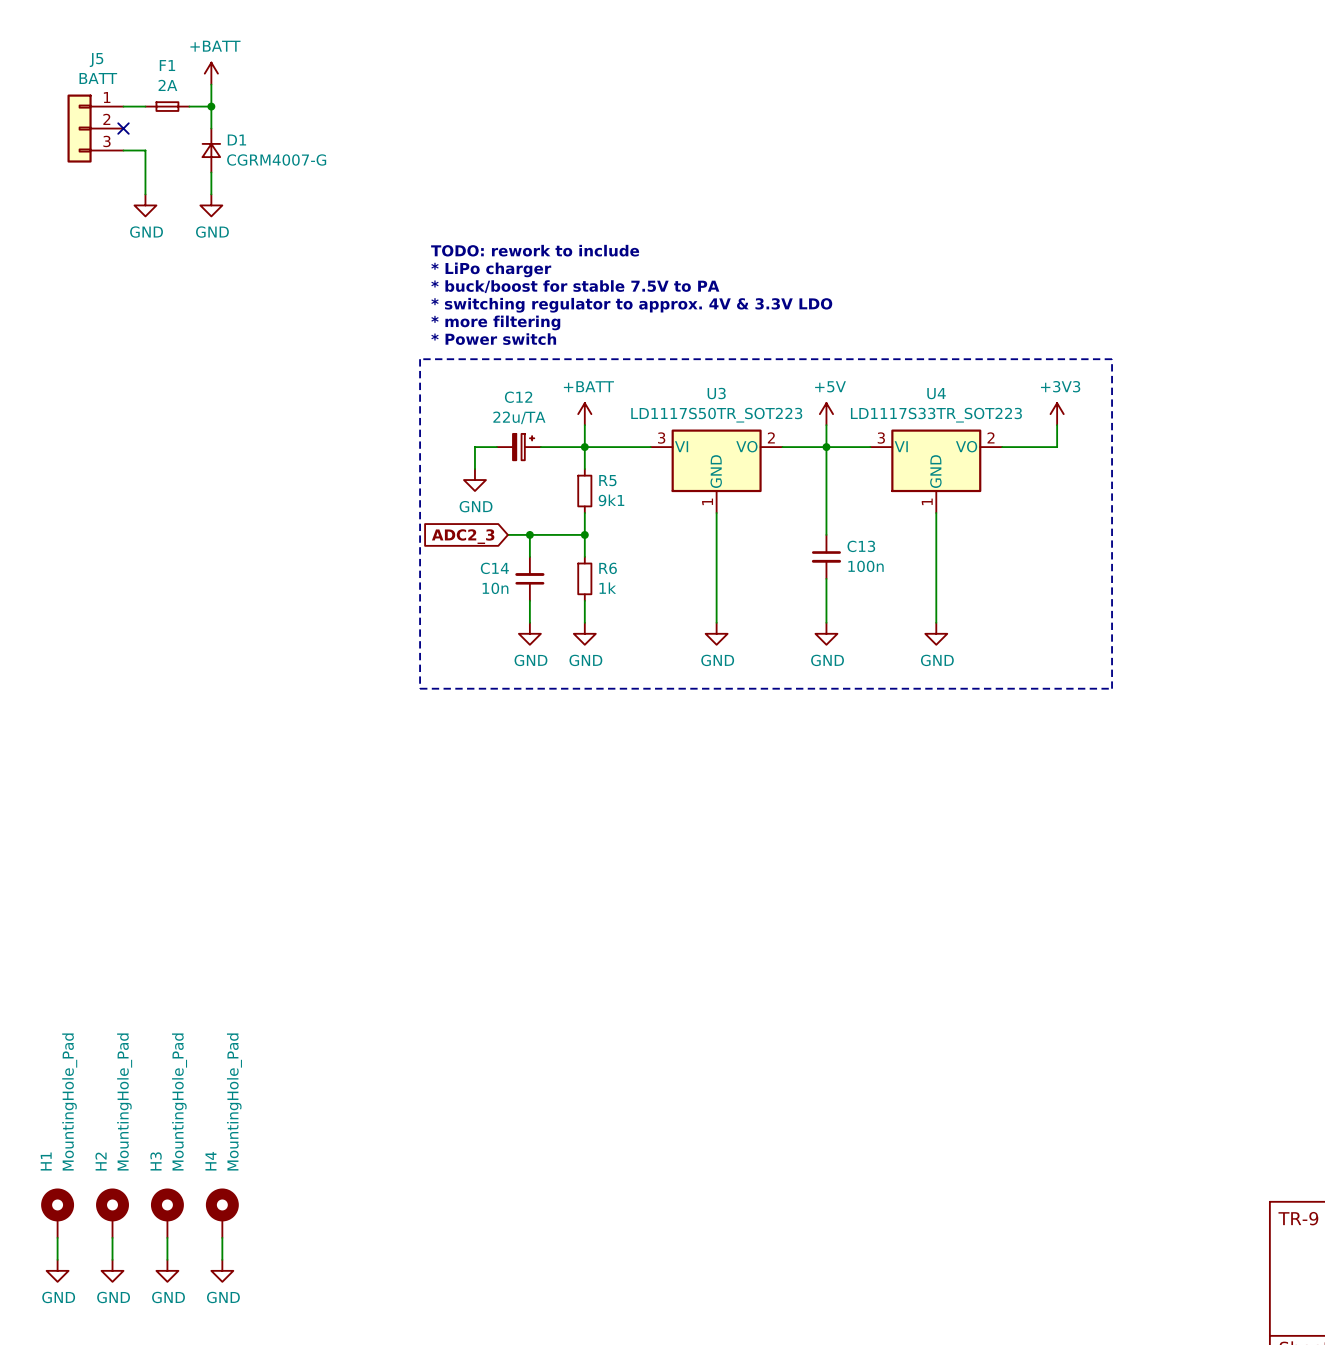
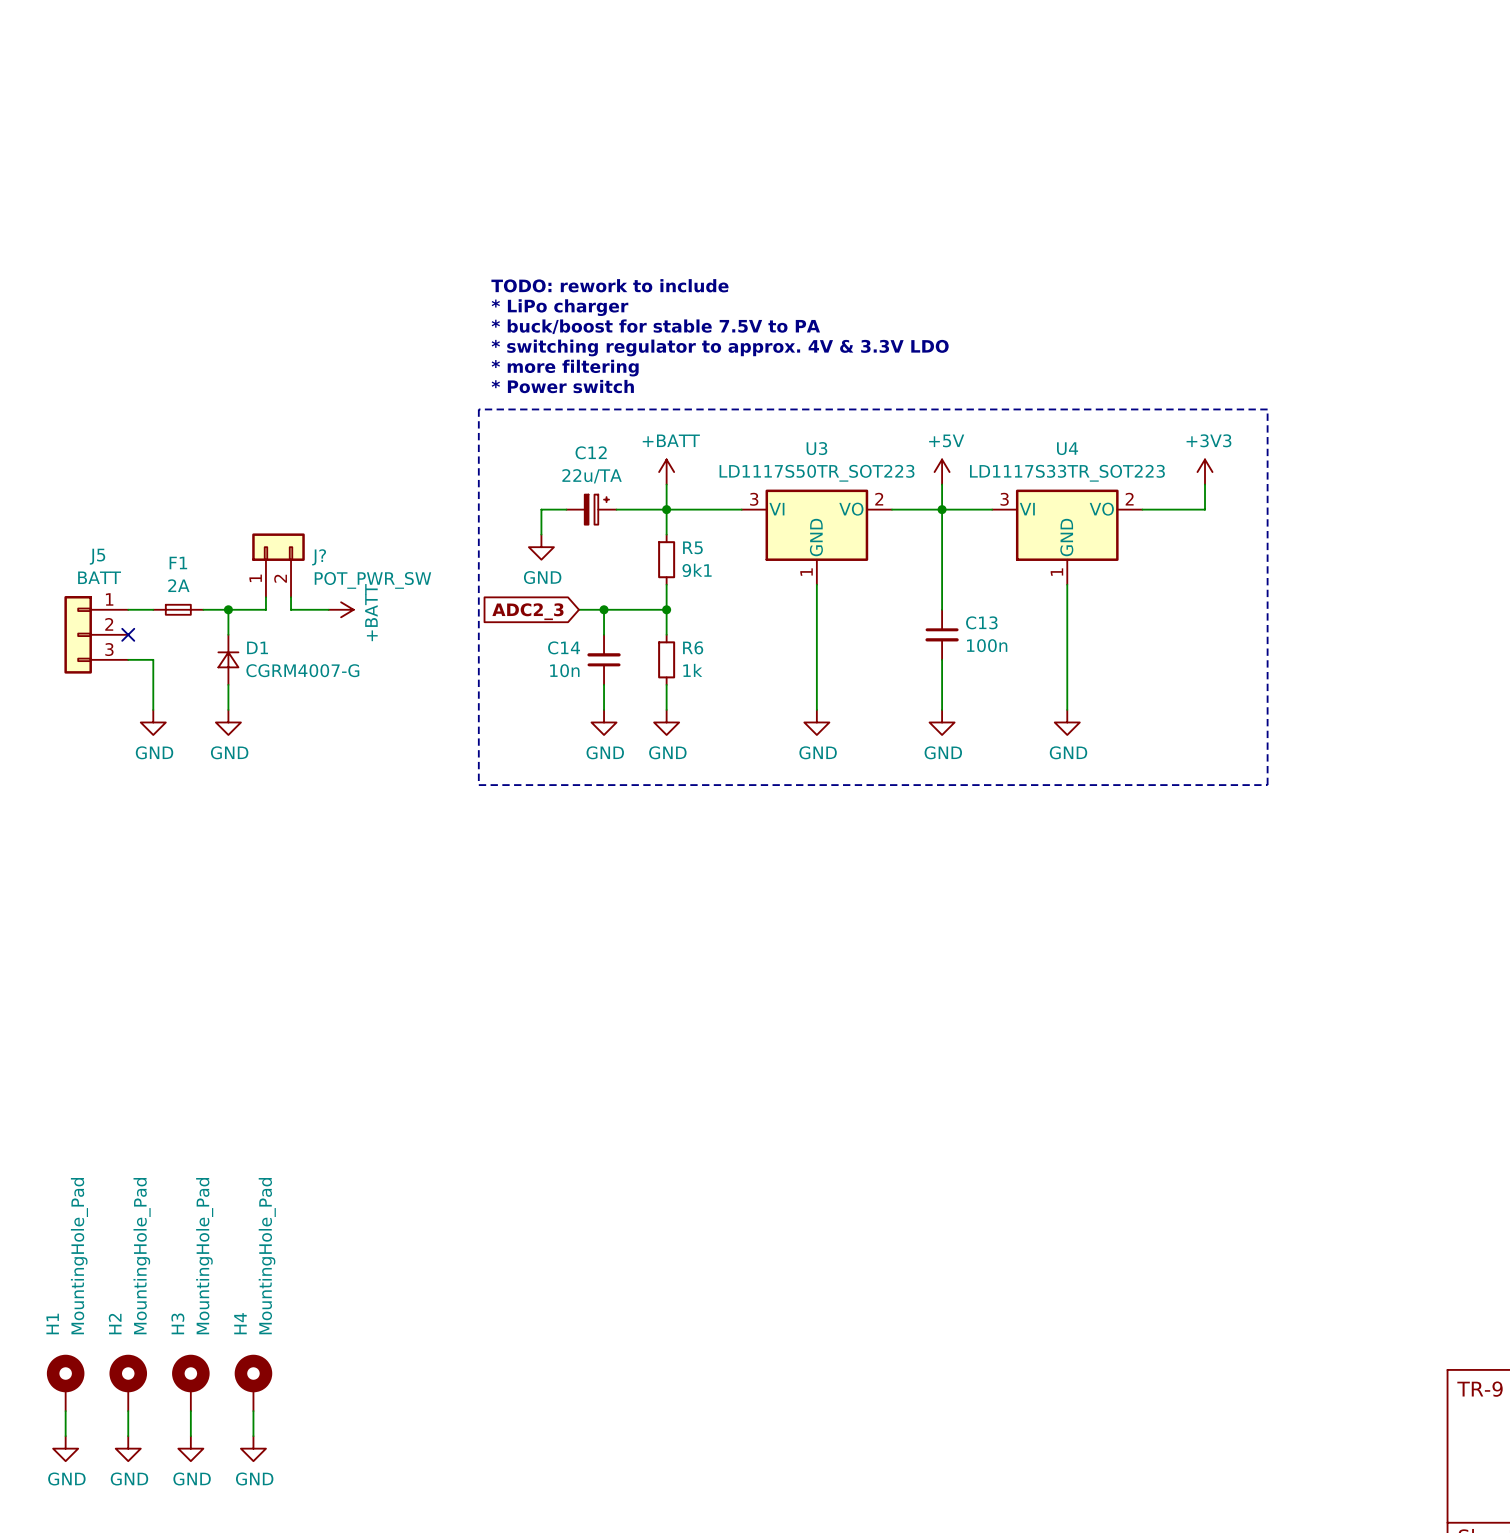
power symbol: +BATT (211, 73) -> none
wire: (211, 84) (211, 128) -> none
wire: (123, 106) (145, 106) -> none
F1 position: (167, 106) -> (178, 609)
wire: (189, 106) (211, 106) -> none
junction: (211, 106) -> none
J5 position: (95, 128) -> (96, 634)
no-connect mark: (123, 128) -> none
wire: (123, 150) (145, 150) (145, 194) -> none
D1 position: (211, 150) -> (228, 659)
wire: (211, 172) (211, 194) -> none
power symbol: GND (145, 205) -> none
power symbol: GND (211, 205) -> none
J?: none -> POT_PWR_SW (278, 565)
wire: none -> (265, 597) (265, 609) (203, 609)
wire: none -> (291, 597) (291, 609) (328, 609)
wire: none -> (128, 609) (153, 609)
wire: none -> (228, 609) (228, 634)
junction: none -> (228, 609)
power symbol: none -> +BATT (341, 609)
no-connect mark: none -> (128, 634)
wire: none -> (128, 659) (153, 659) (153, 709)
wire: none -> (228, 684) (228, 709)
power symbol: none -> GND (153, 722)
power symbol: none -> GND (228, 722)

